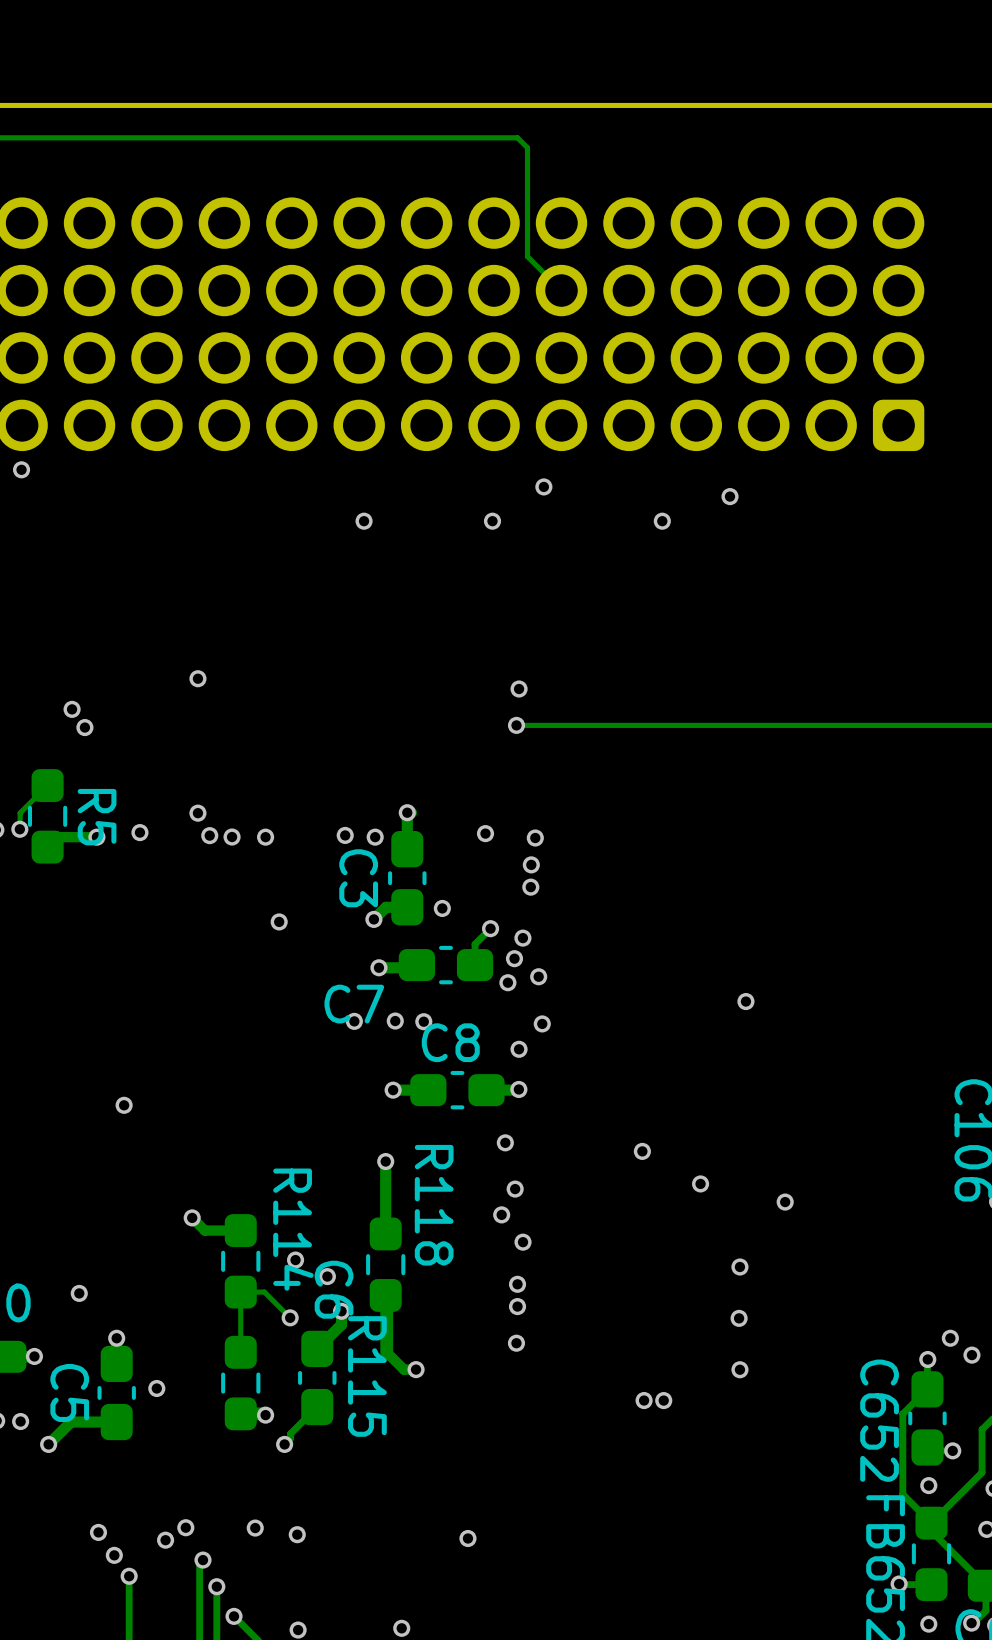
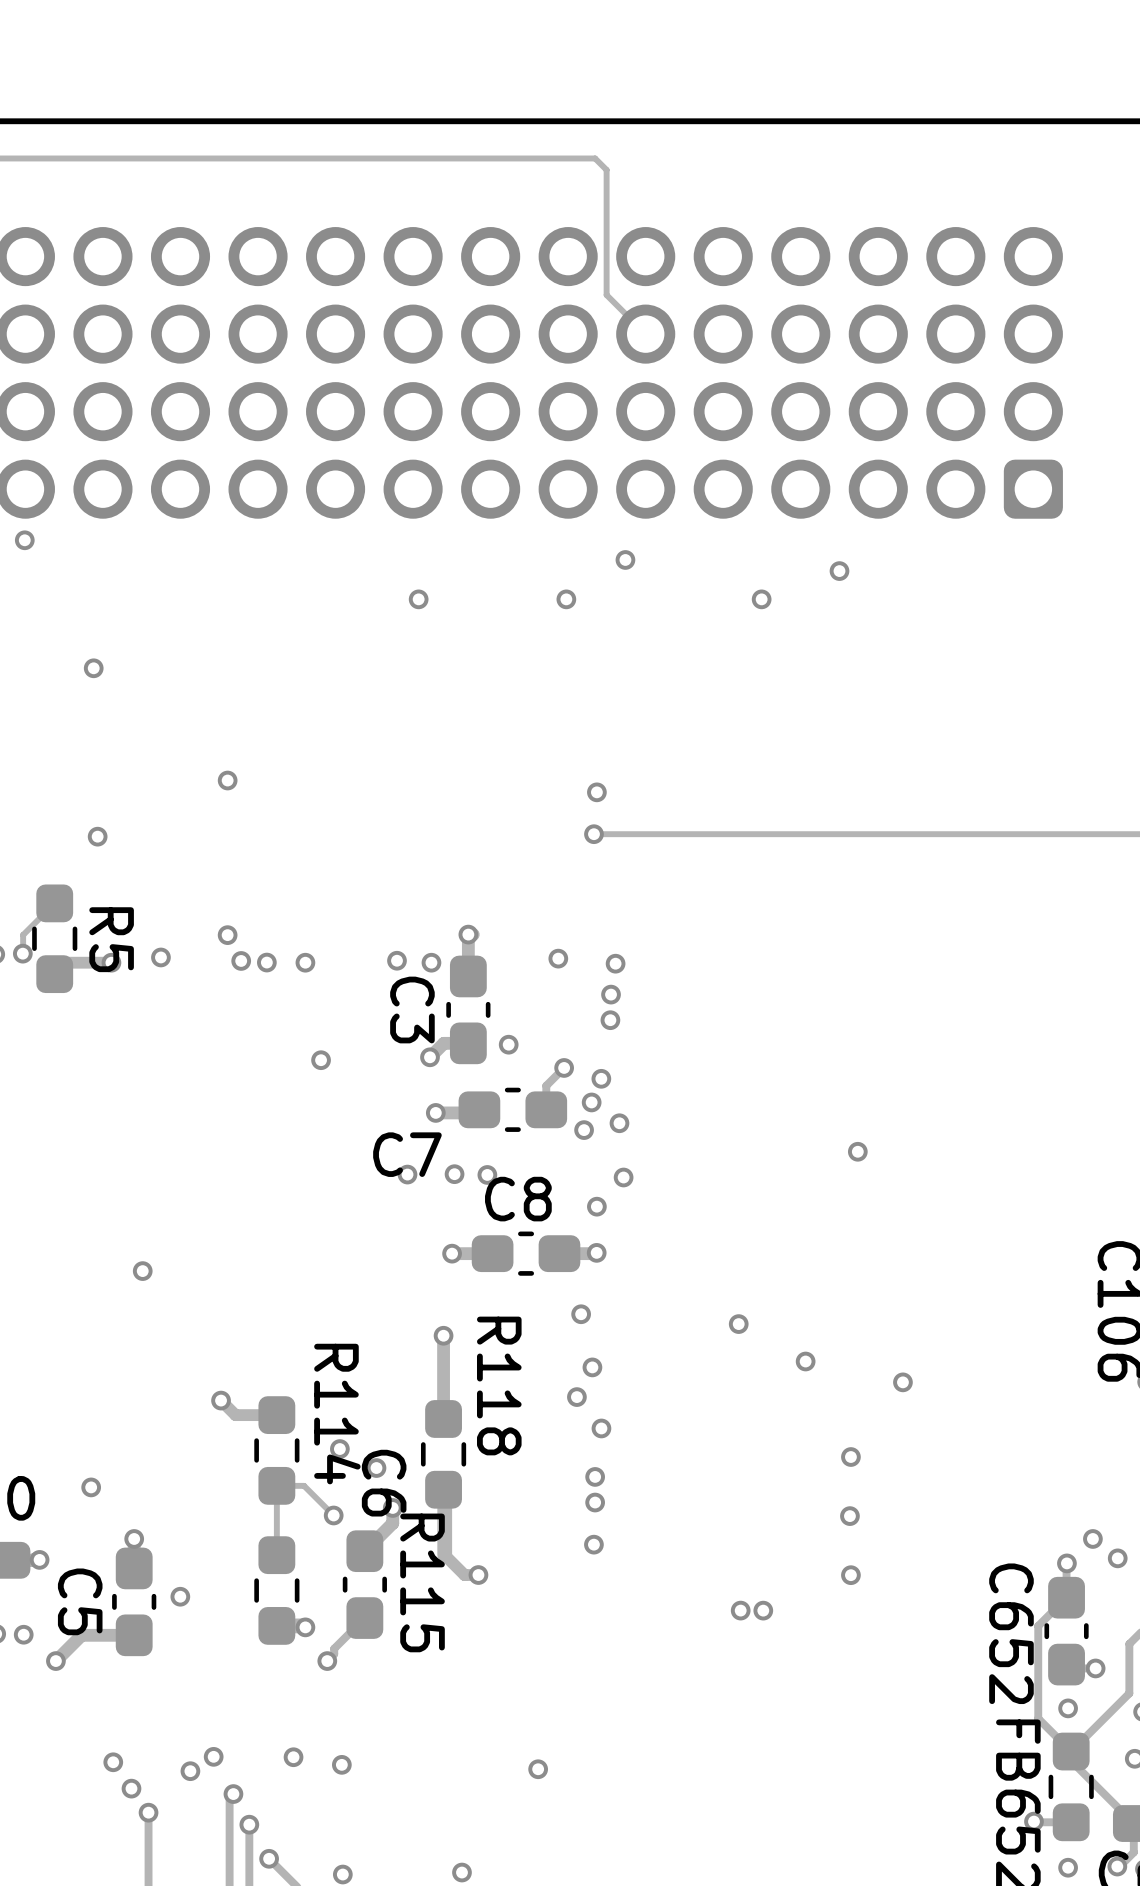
via: none -> (93, 668)
via: (72, 709) -> none

